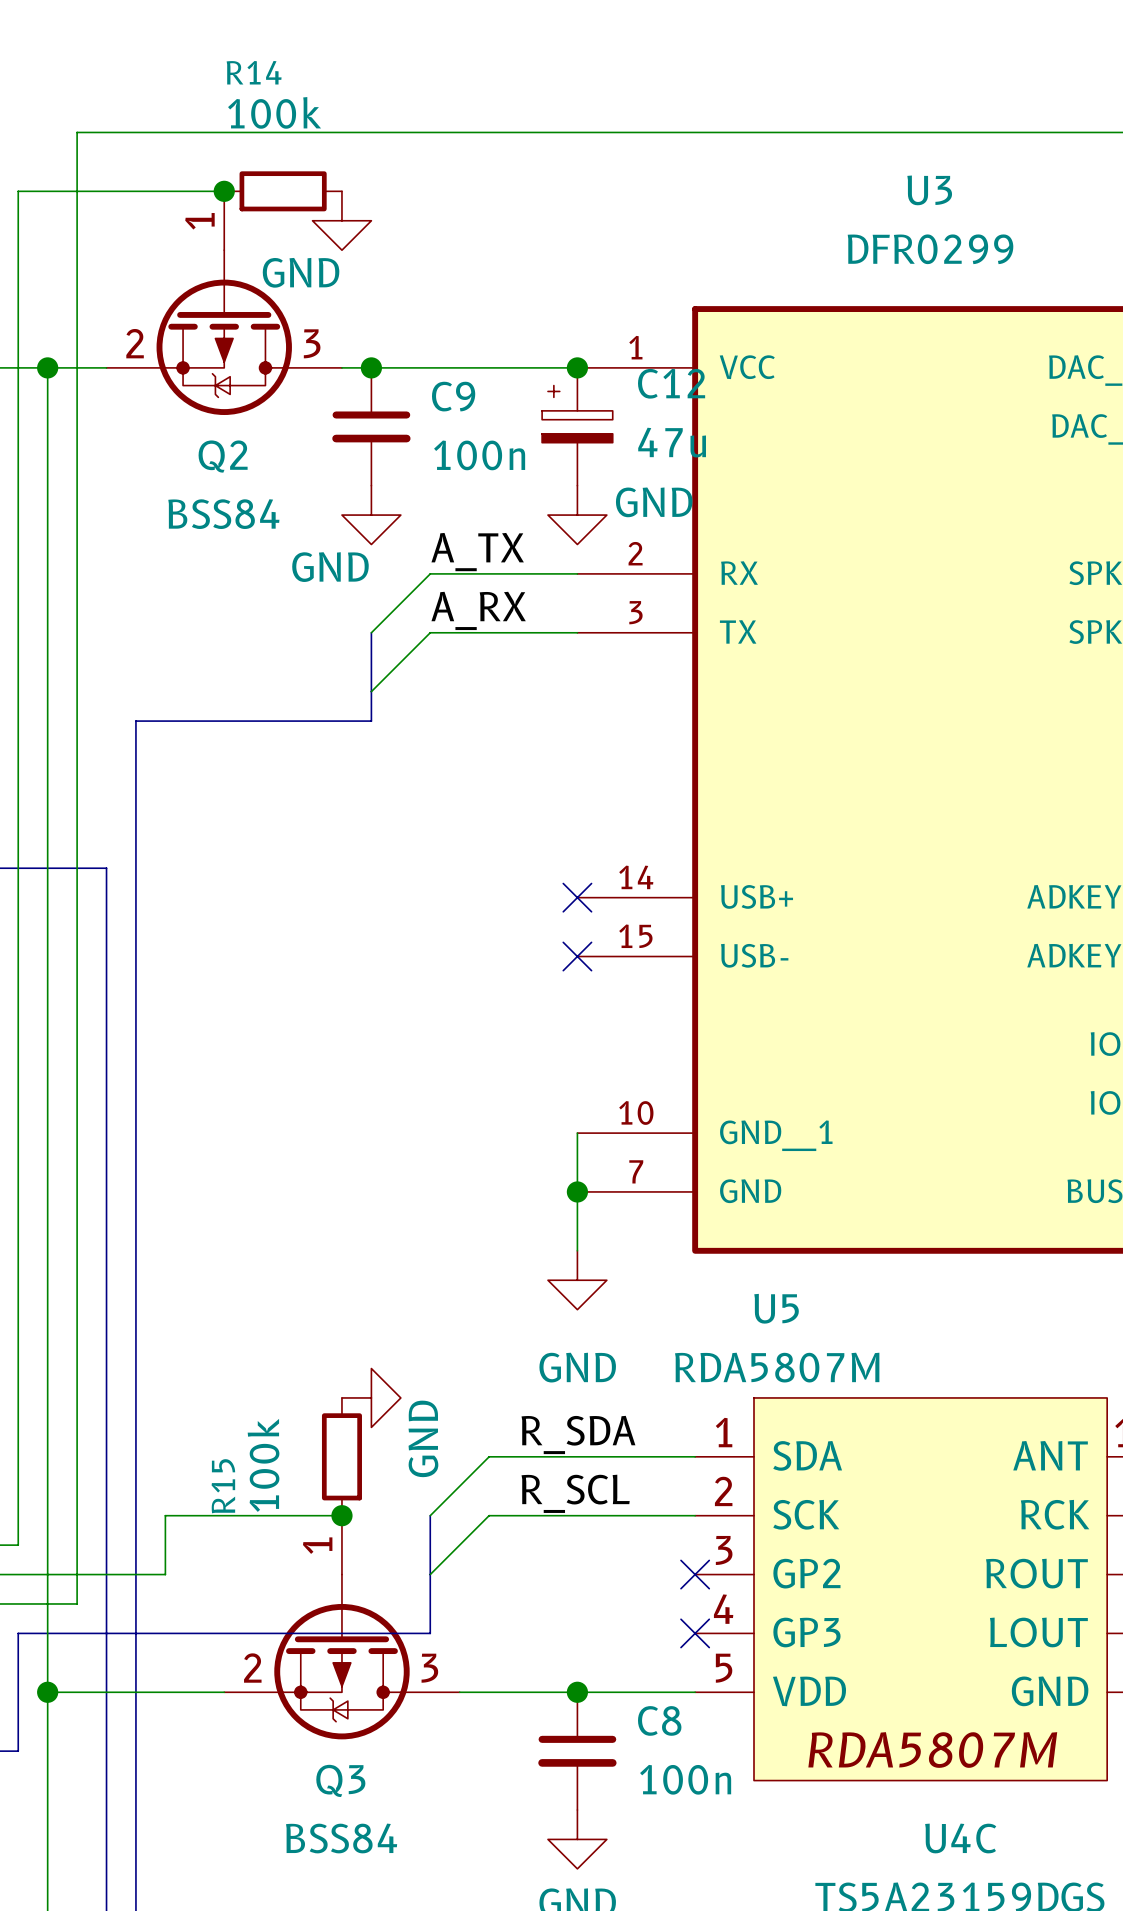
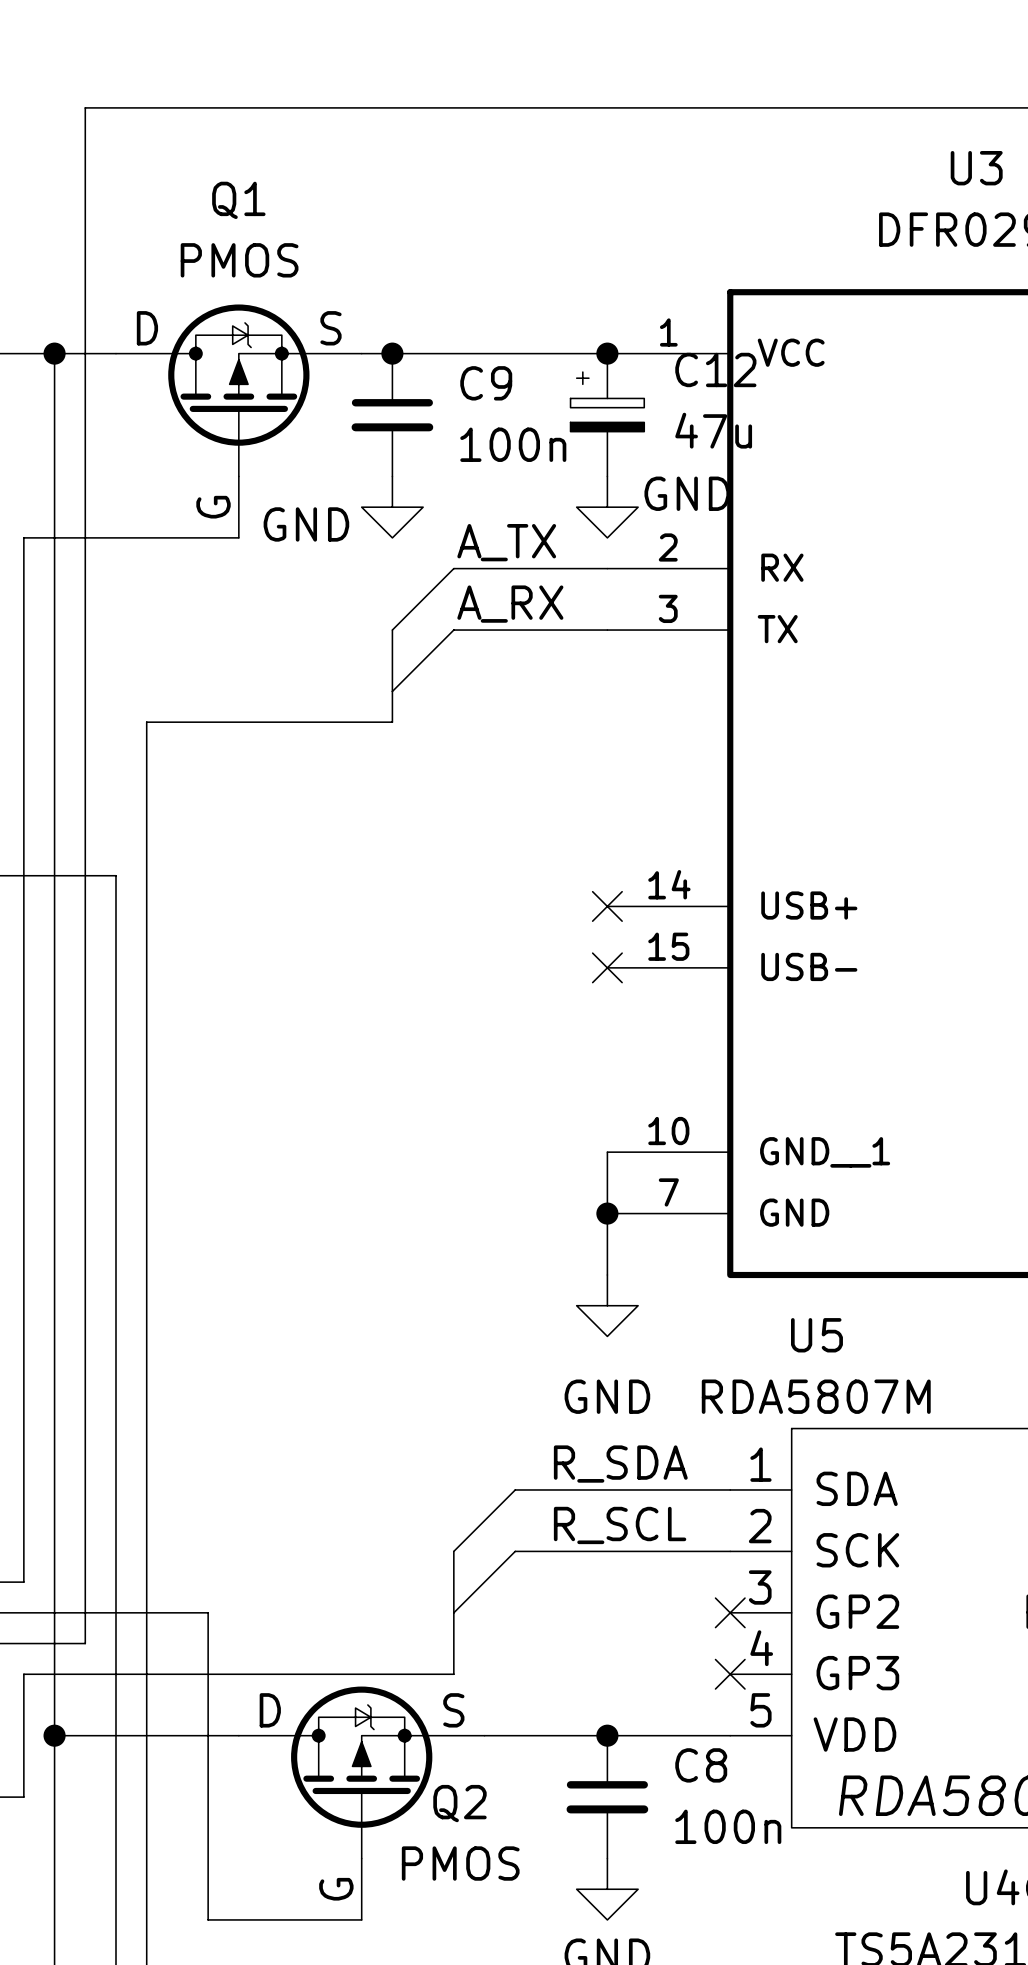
Q2 symbol: [106, 191, 342, 416] -> [238, 1686, 485, 1920]
wire: (224, 191) (18, 191) (18, 544) -> (238, 537) (23, 537)
junction: (224, 191) -> none
R14: 100k (283, 191) -> none
power symbol: GND (341, 220) -> none
Q1: none -> PMOS (238, 421)
Q2 name position: Q2 (223, 456) -> Q2 (459, 1803)
Q2 value: BSS84 (223, 514) -> PMOS (460, 1863)
power symbol text position: GND (330, 567) -> GND (306, 524)
power symbol: GND (371, 1397) -> none
R15: 100k (341, 1456) -> none
wire: (341, 1515) (165, 1515) (165, 1574) -> (361, 1919) (208, 1919) (208, 1612) (177, 1612)
junction: (341, 1515) -> none
Q3: BSS84 (341, 1627) -> none

